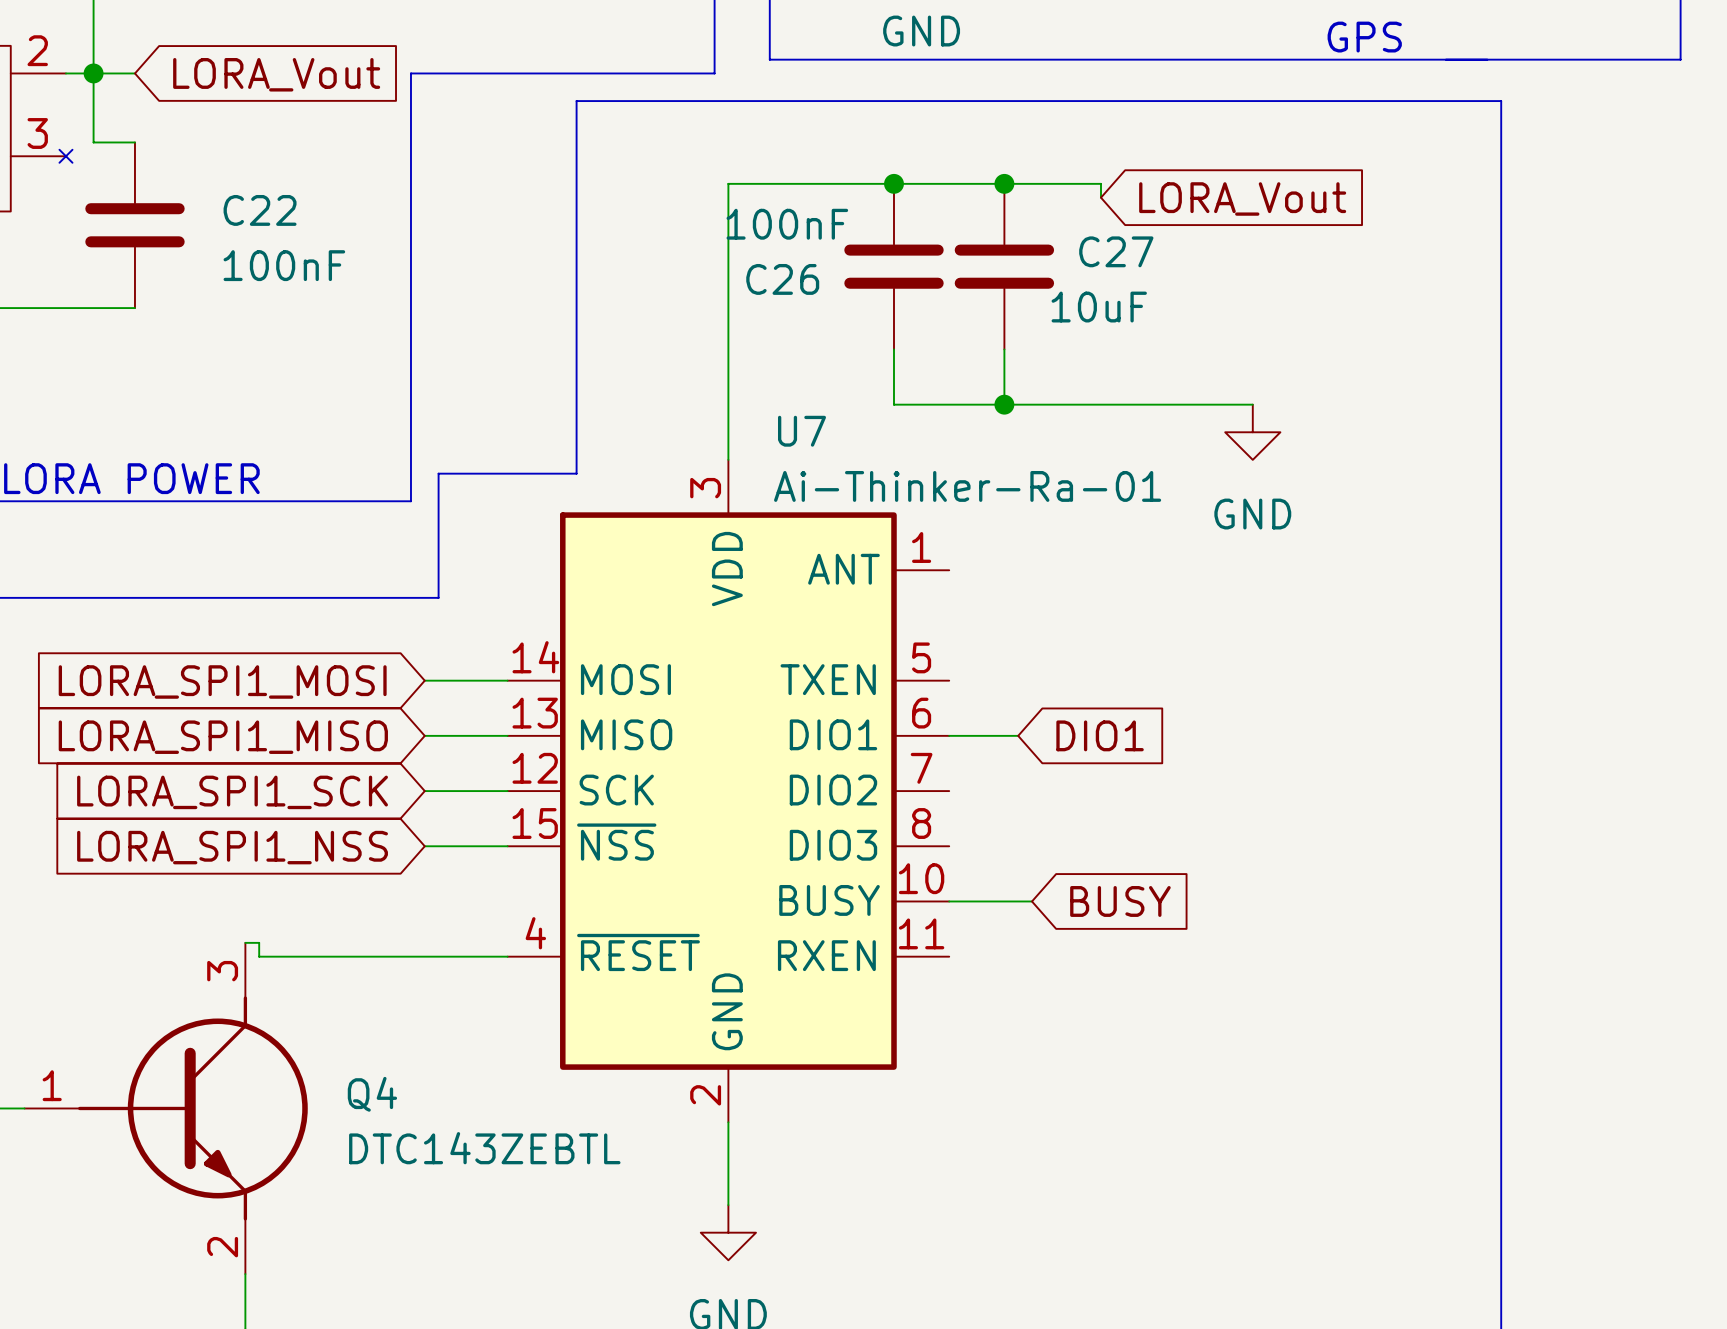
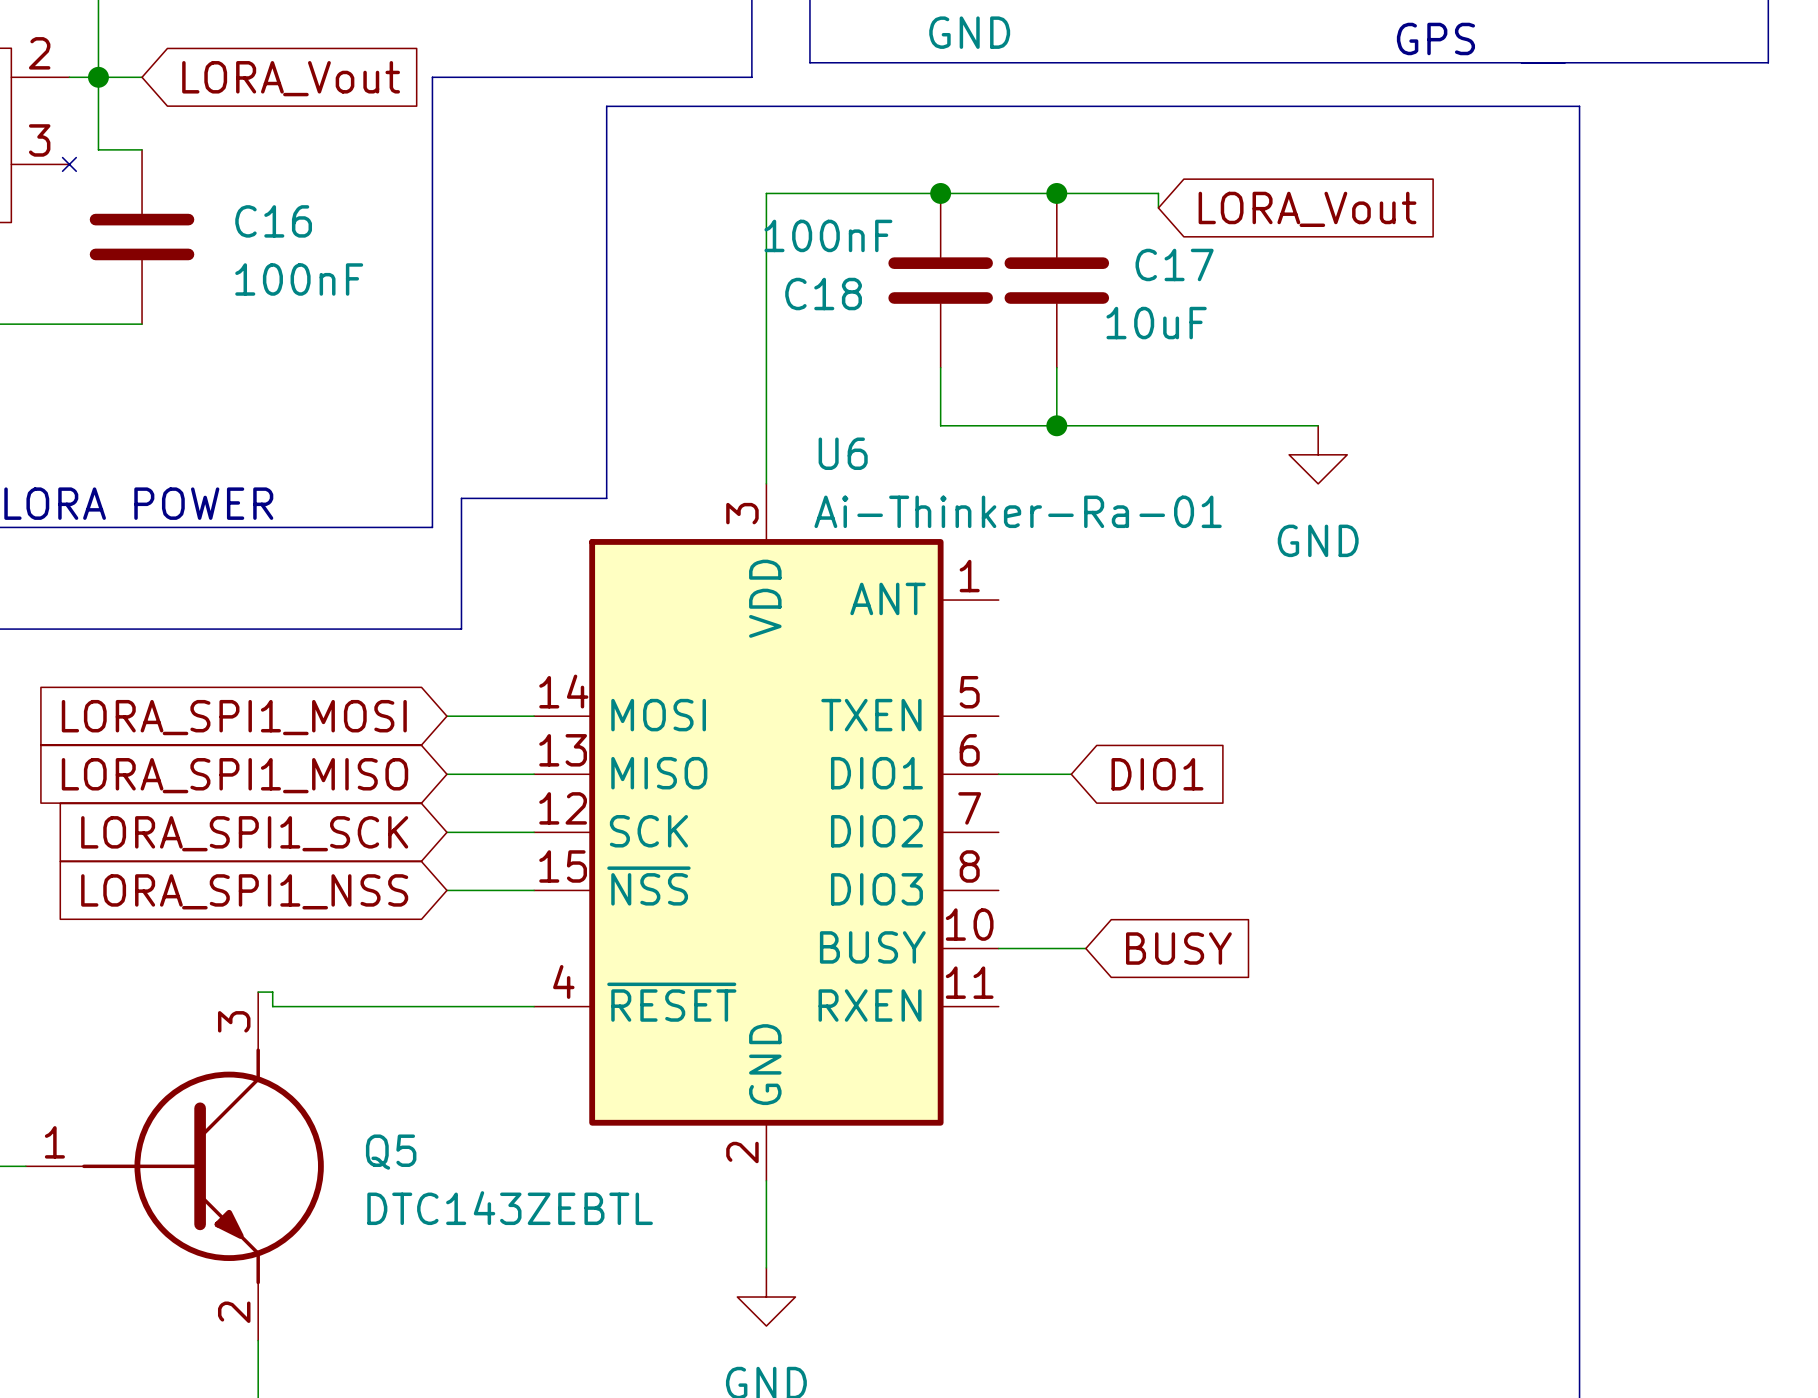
C22 name: C22 (260, 210) -> C16 (273, 221)
C27 name: C27 (1116, 251) -> C17 (1174, 264)
C26 name: C26 (782, 279) -> C18 (823, 294)
U7 name: U7 (801, 431) -> U6 (843, 453)
Q4 name: Q4 (372, 1094) -> Q5 (391, 1152)

